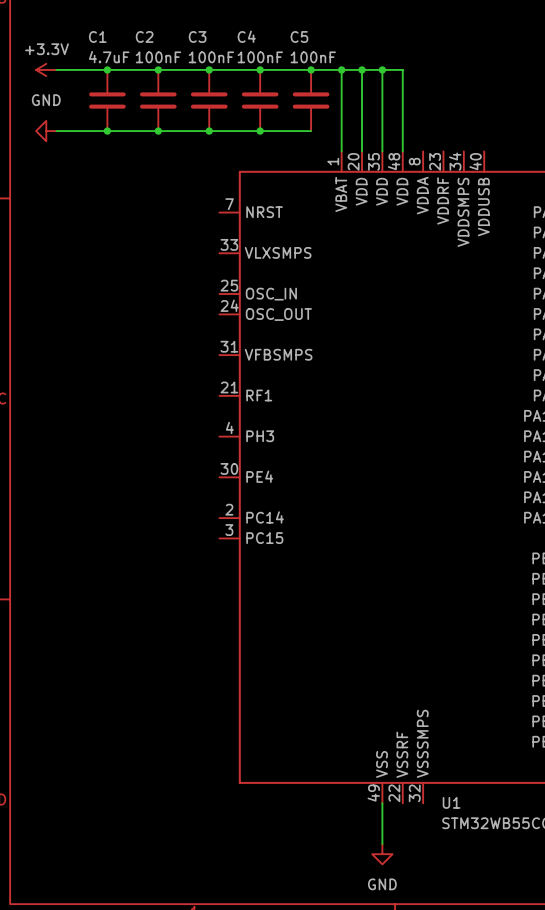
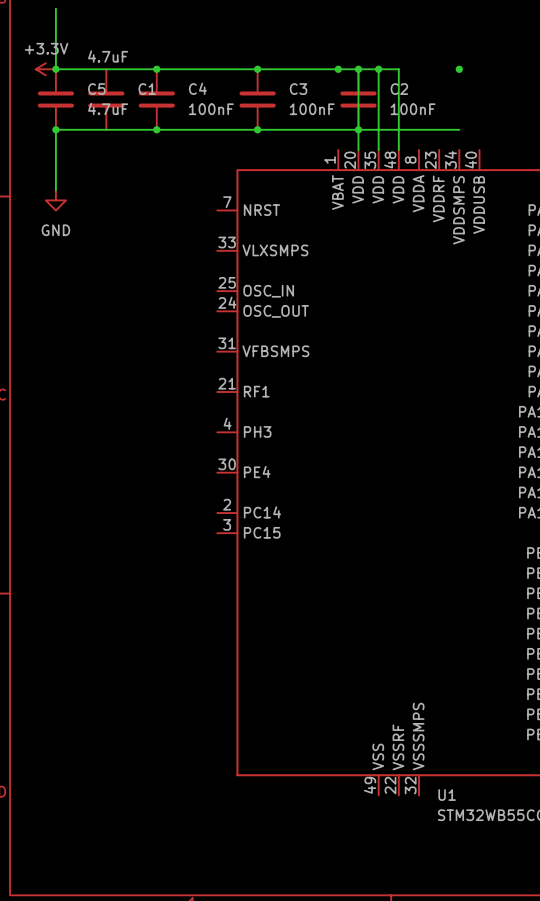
wire: none -> (55, 8) (55, 69)
C1 name position: C1 (97, 36) -> C1 (147, 89)
C2 name: C2 (144, 36) -> C4 (197, 88)
C4 name: C4 (246, 36) -> C3 (298, 89)
C5 name position: C5 (299, 36) -> C5 (96, 89)
C2 value position: 100nF (158, 57) -> 100nF (211, 109)
C4 value position: 100nF (260, 57) -> 100nF (312, 109)
C5 value: 100nF (313, 57) -> 4.7uF (108, 109)
junction: none -> (55, 69)
junction: (107, 69) -> none
junction: (209, 69) -> none
junction: (311, 69) -> none
wire: (341, 69) (341, 151) -> none
junction: none -> (459, 69)
power symbol text position: GND (46, 100) -> GND (55, 230)
C3: 100nF (209, 100) -> none
C5 position: (311, 100) -> (55, 99)
C2: none -> 100nF (358, 99)
power symbol rotation: 0° (46, 131) -> 90° counterclockwise (55, 200)
power symbol position: GND (46, 131) -> GND (55, 200)
wire: none -> (55, 129) (55, 190)
junction: none -> (55, 129)
junction: (107, 131) -> none
junction: (209, 131) -> none
wire: none -> (308, 129) (459, 129)
junction: none -> (358, 129)
wire: (382, 803) (382, 844) -> none
power symbol: GND (382, 854) -> none

